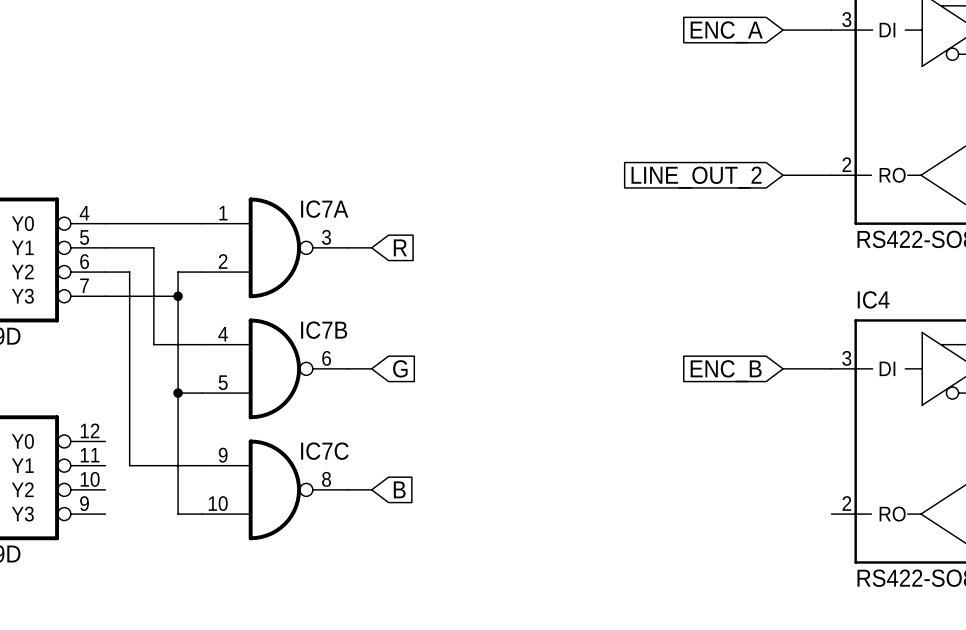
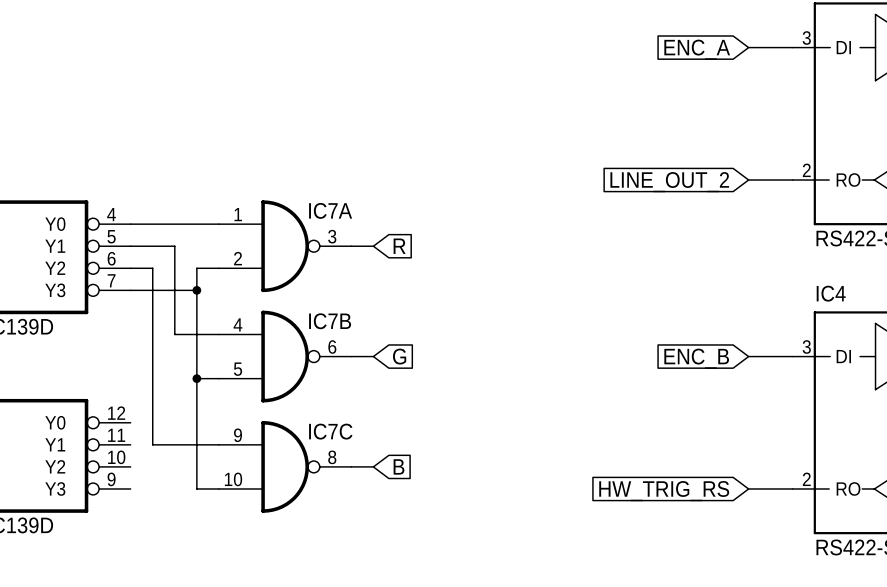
wire: none -> (748, 488) (792, 488)
global label: none -> HW_TRIG_RS (664, 491)

